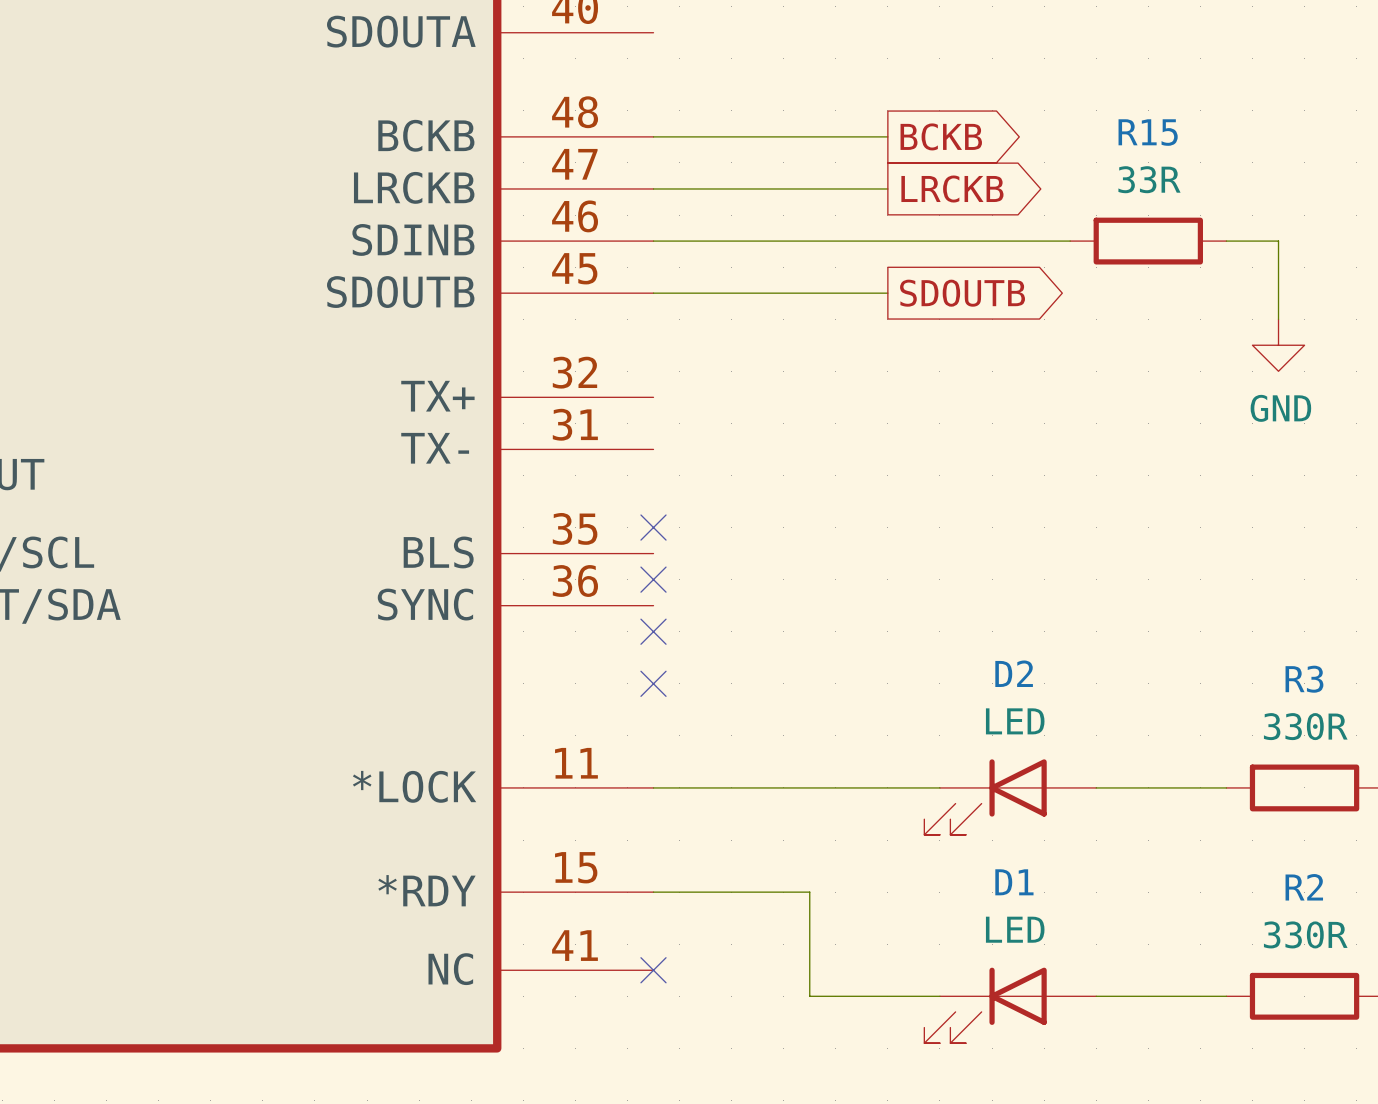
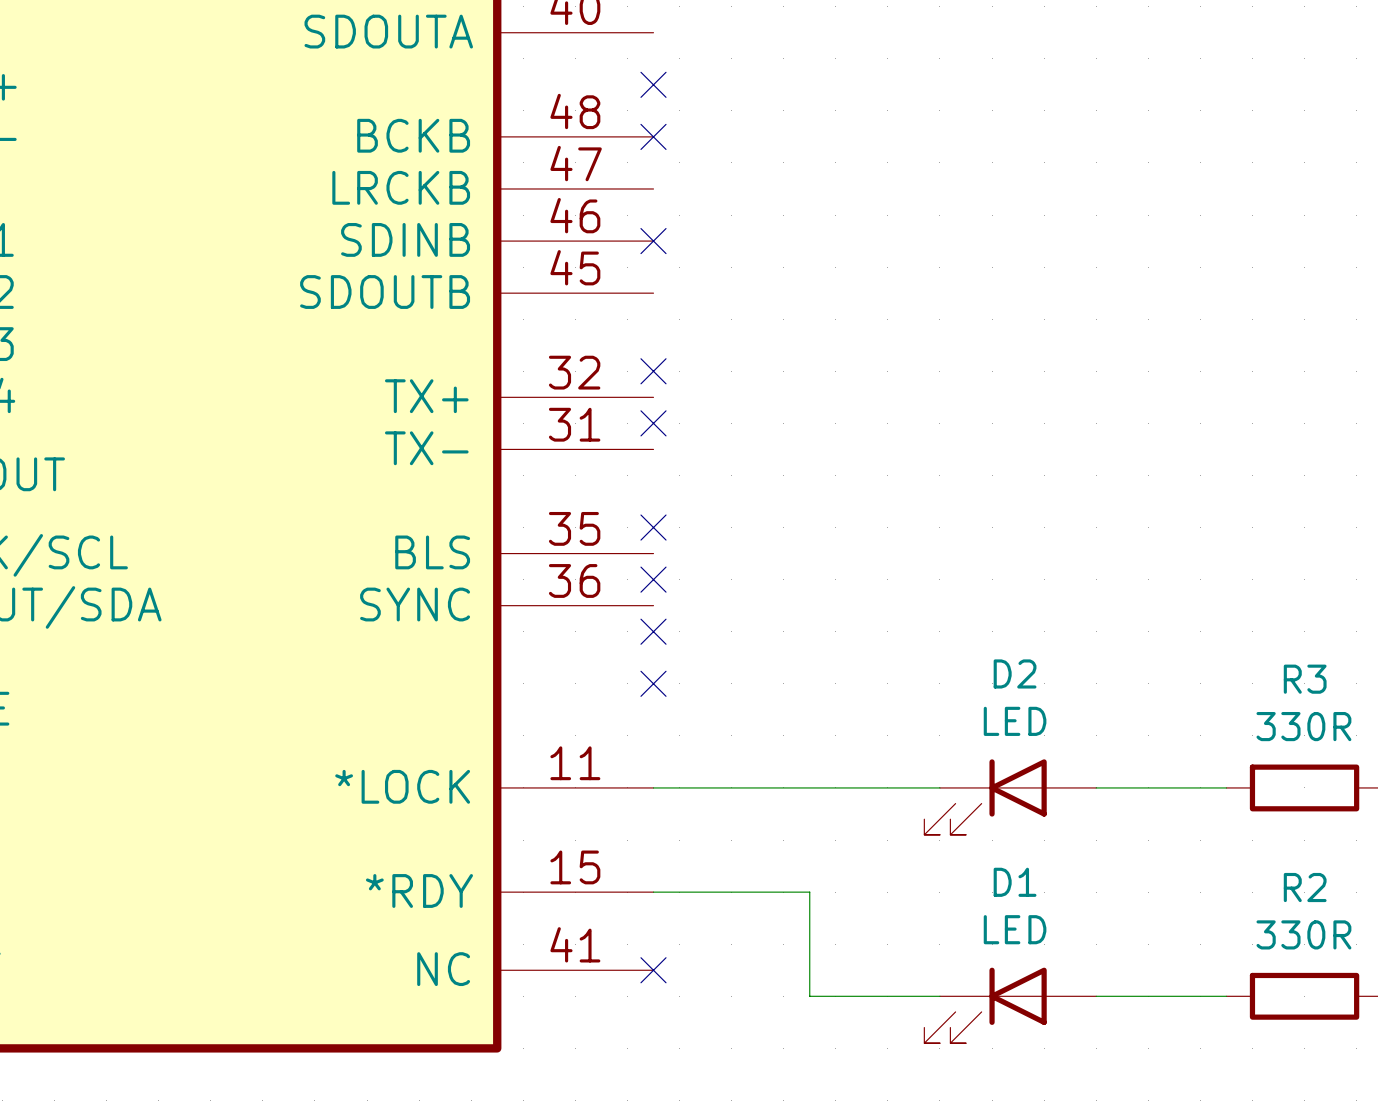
no-connect mark: none -> (653, 84)
wire: (653, 136) (887, 136) -> none
no-connect mark: none -> (653, 136)
global label: BCKB (941, 136) -> none
wire: (653, 188) (887, 188) -> none
global label: LRCKB (952, 189) -> none
wire: (653, 241) (1070, 241) -> none
no-connect mark: none -> (653, 241)
R15: 33R (1148, 241) -> none
wire: (1226, 241) (1278, 241) (1278, 319) -> none
wire: (653, 293) (887, 293) -> none
global label: SDOUTB (962, 293) -> none
power symbol: GND (1278, 345) -> none
no-connect mark: none -> (653, 371)
no-connect mark: none -> (653, 423)

